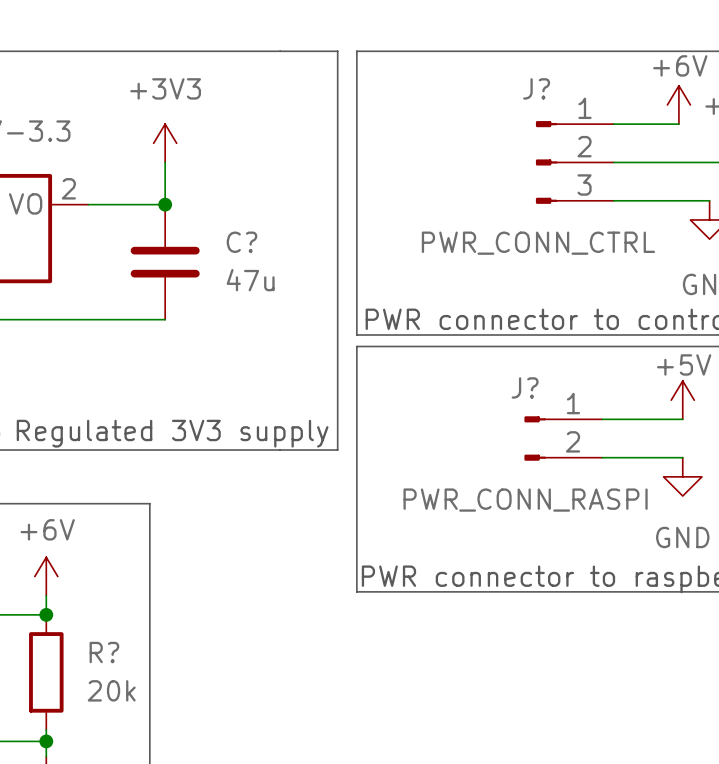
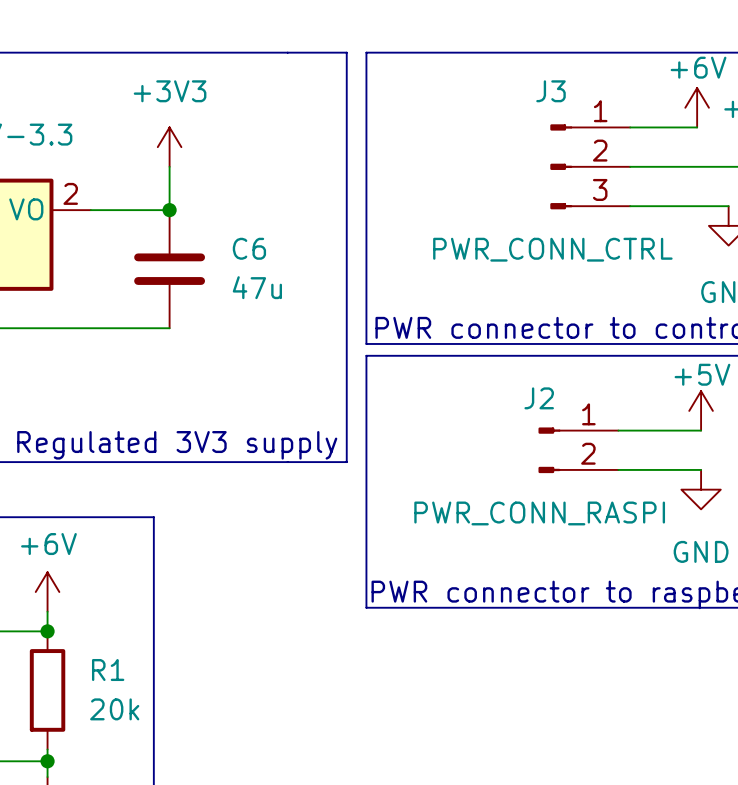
J? name: J? (536, 88) -> J3 (551, 91)
C? name: C? (241, 242) -> C6 (249, 248)
J? name: J? (525, 387) -> J2 (539, 398)
R? name: R? (104, 652) -> R1 (108, 670)

